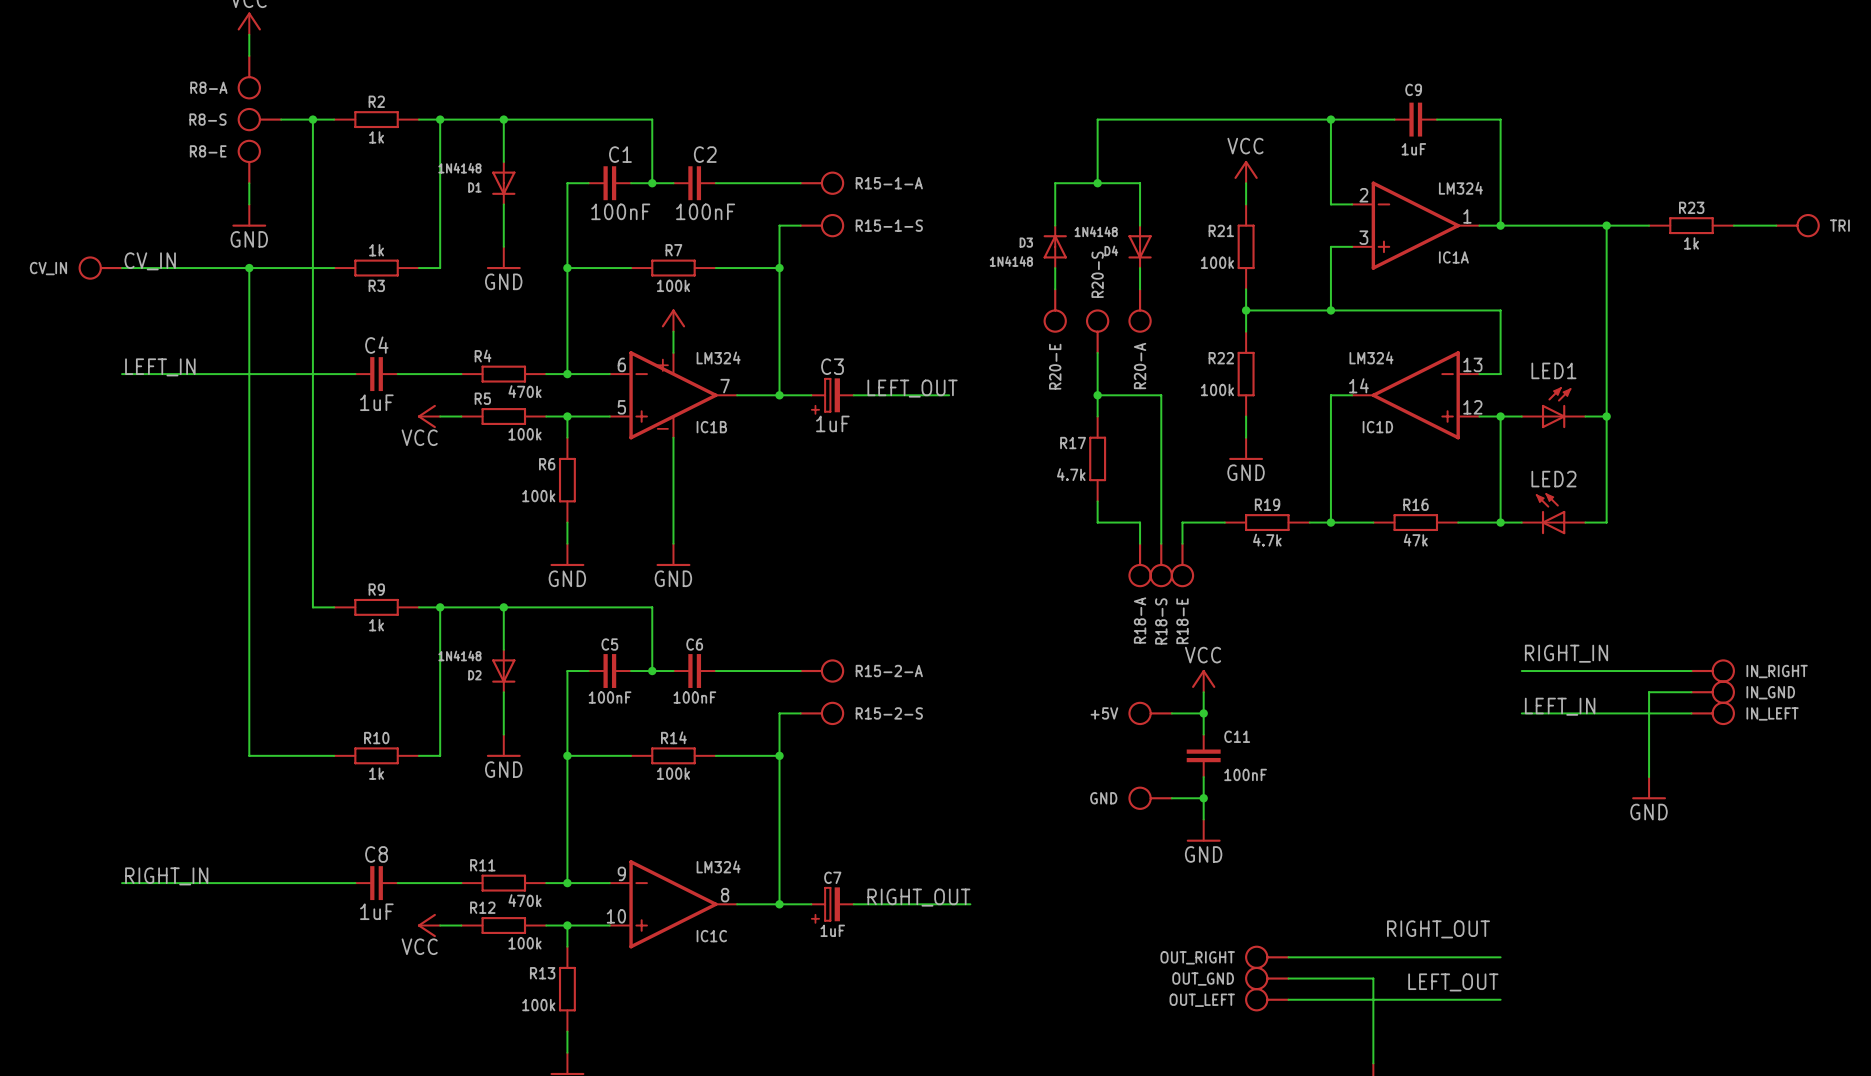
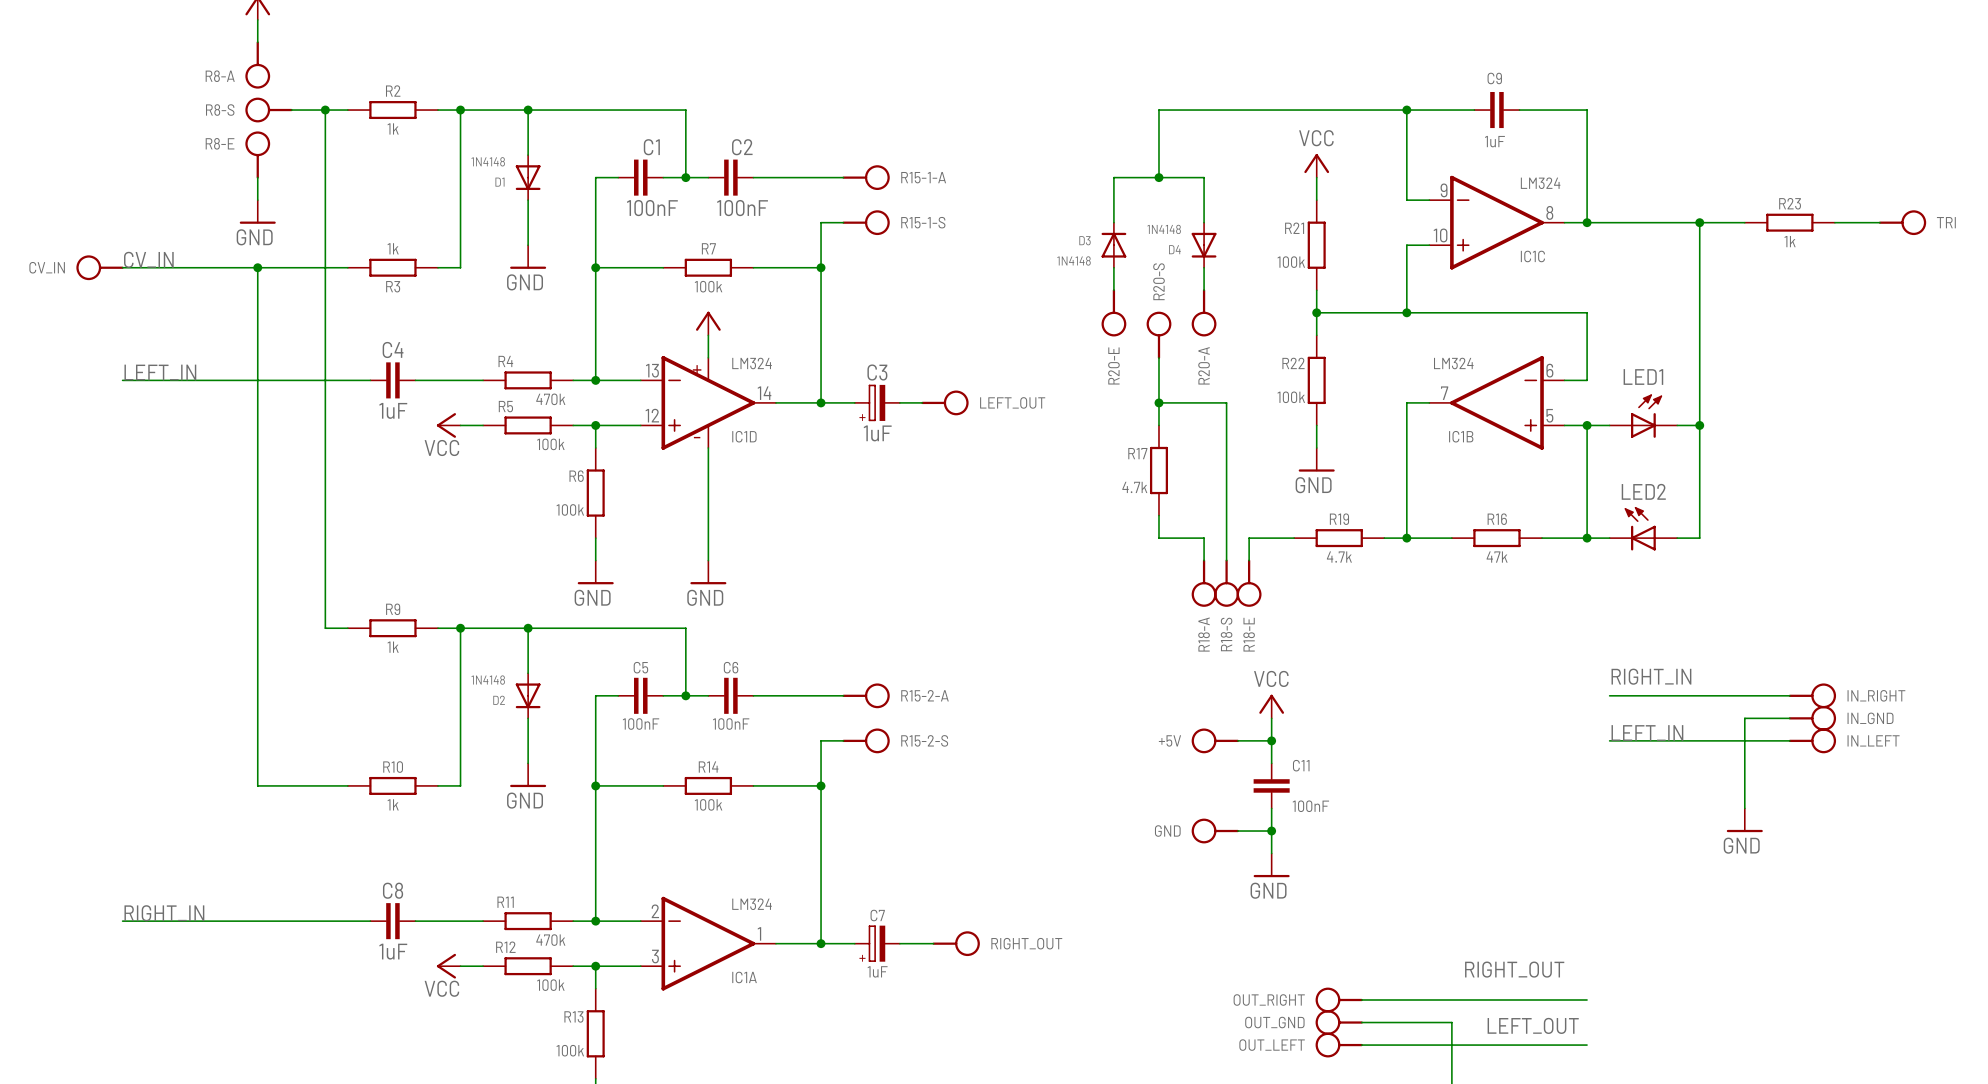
IC1A position: (1415, 225) -> (708, 943)
label: LEFT_OUT (912, 388) -> none
IC1B flip: as is (673, 395) -> left-right (1496, 402)
IC1B position: (673, 395) -> (1496, 402)
wire: (874, 395) (949, 395) -> none
LEFT_OUT: none -> (944, 402)
IC1D flip: as is (1415, 395) -> left-right (708, 402)
IC1D position: (1415, 395) -> (708, 402)
label: RIGHT_OUT (918, 897) -> none
IC1C position: (673, 904) -> (1496, 222)
wire: (885, 904) (970, 904) -> none
RIGHT_OUT: none -> (956, 943)

